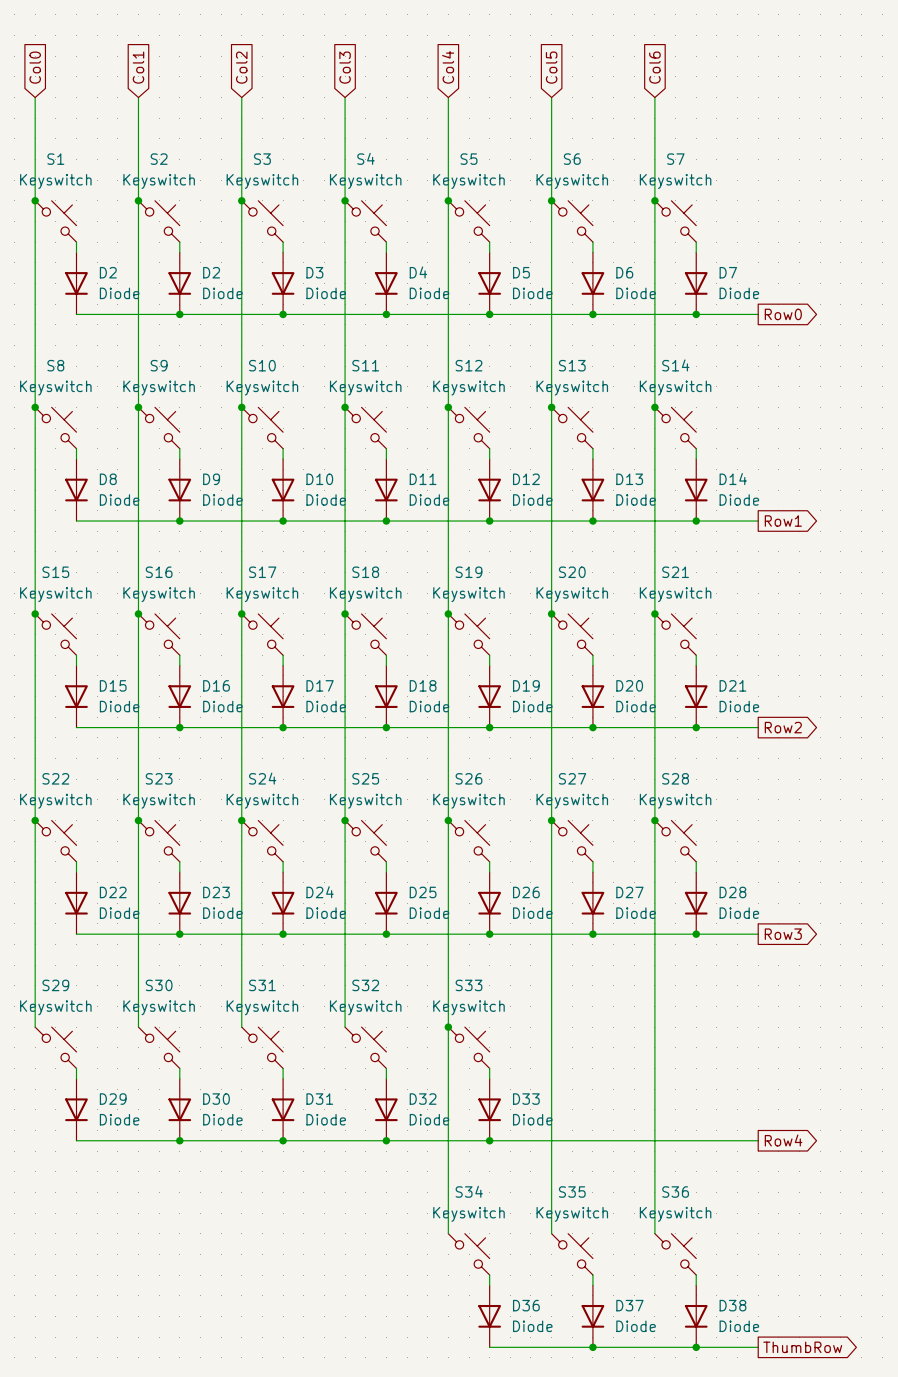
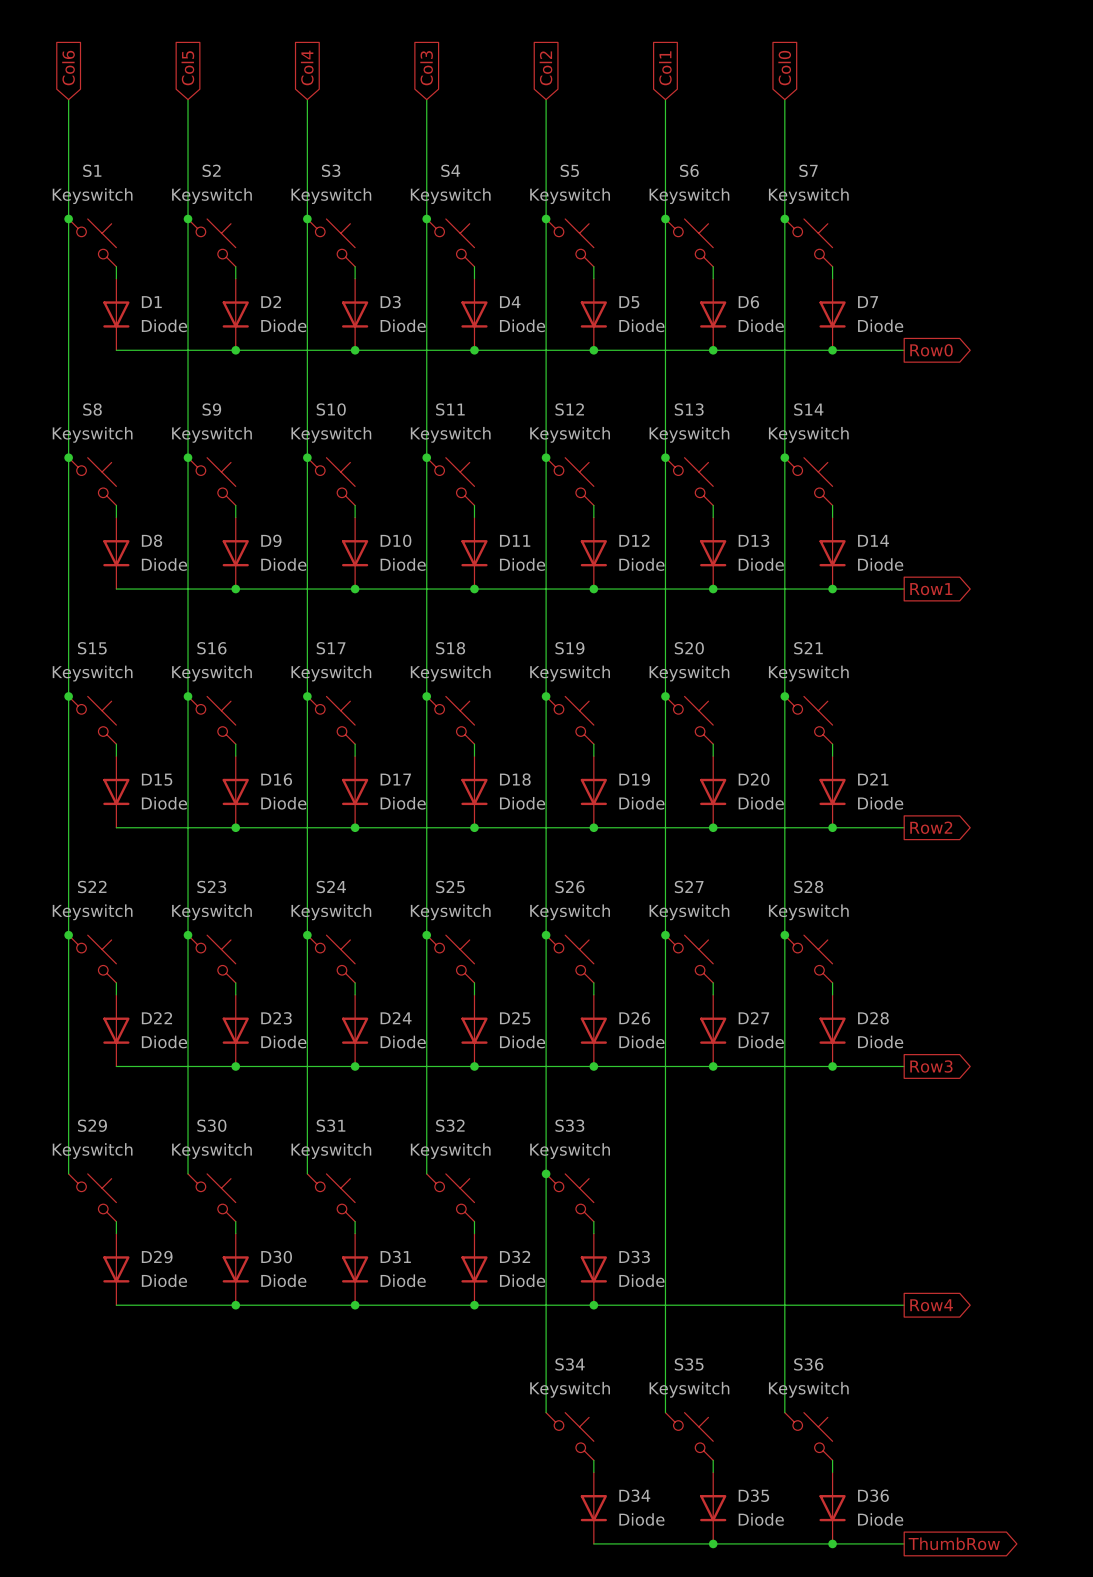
global label: Col0 (35, 67) -> Col6 (68, 68)
global label: Col1 (138, 67) -> Col5 (187, 68)
global label: Col2 (241, 67) -> Col4 (307, 67)
global label: Col4 (448, 67) -> Col2 (545, 68)
global label: Col5 (551, 67) -> Col1 (665, 68)
global label: Col6 (654, 67) -> Col0 (784, 68)
D2 name: D2 (108, 272) -> D1 (151, 302)
D36 name: D36 (526, 1305) -> D34 (634, 1495)
D37 name: D37 (629, 1305) -> D35 (753, 1495)
D38 name: D38 (732, 1305) -> D36 (873, 1495)

